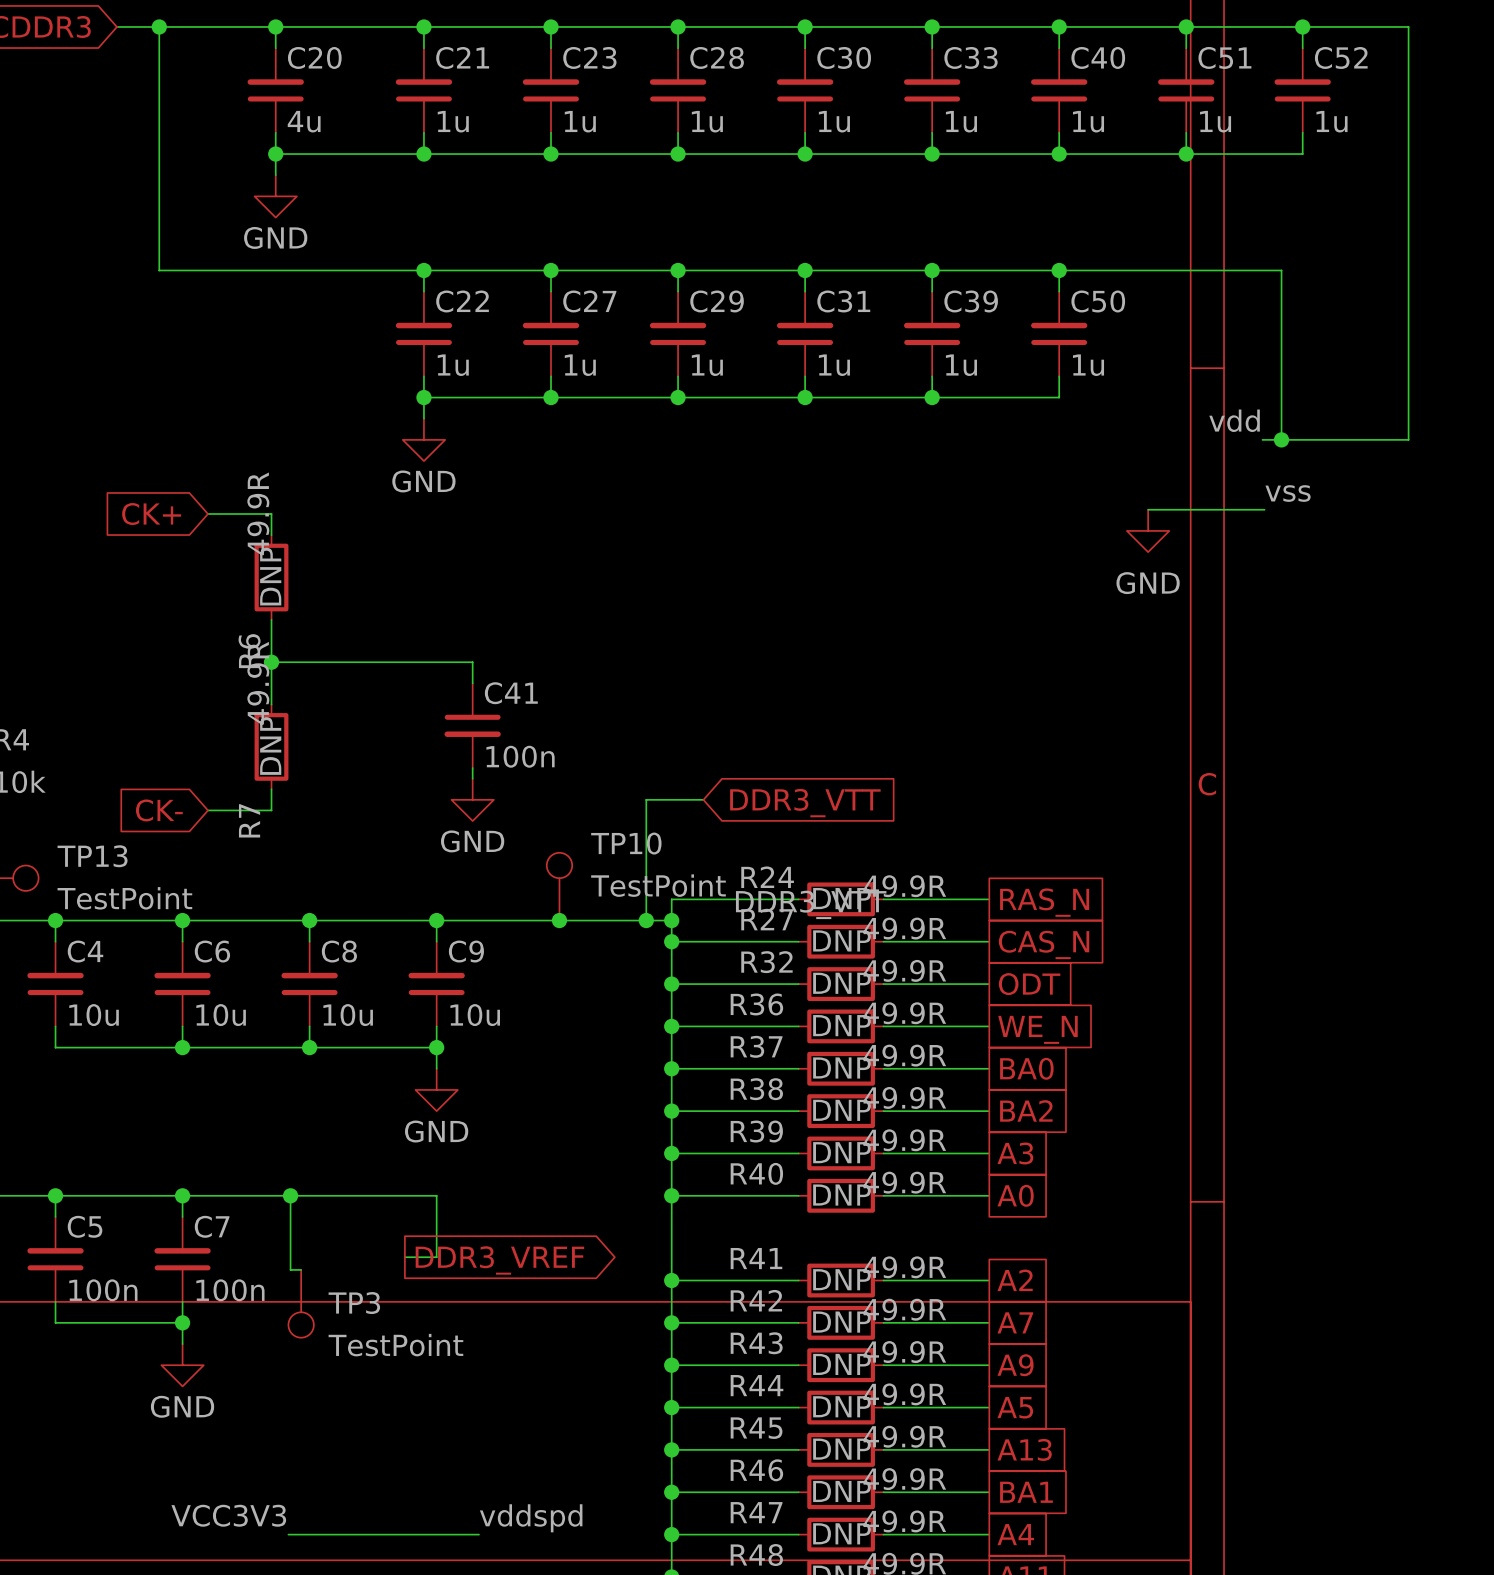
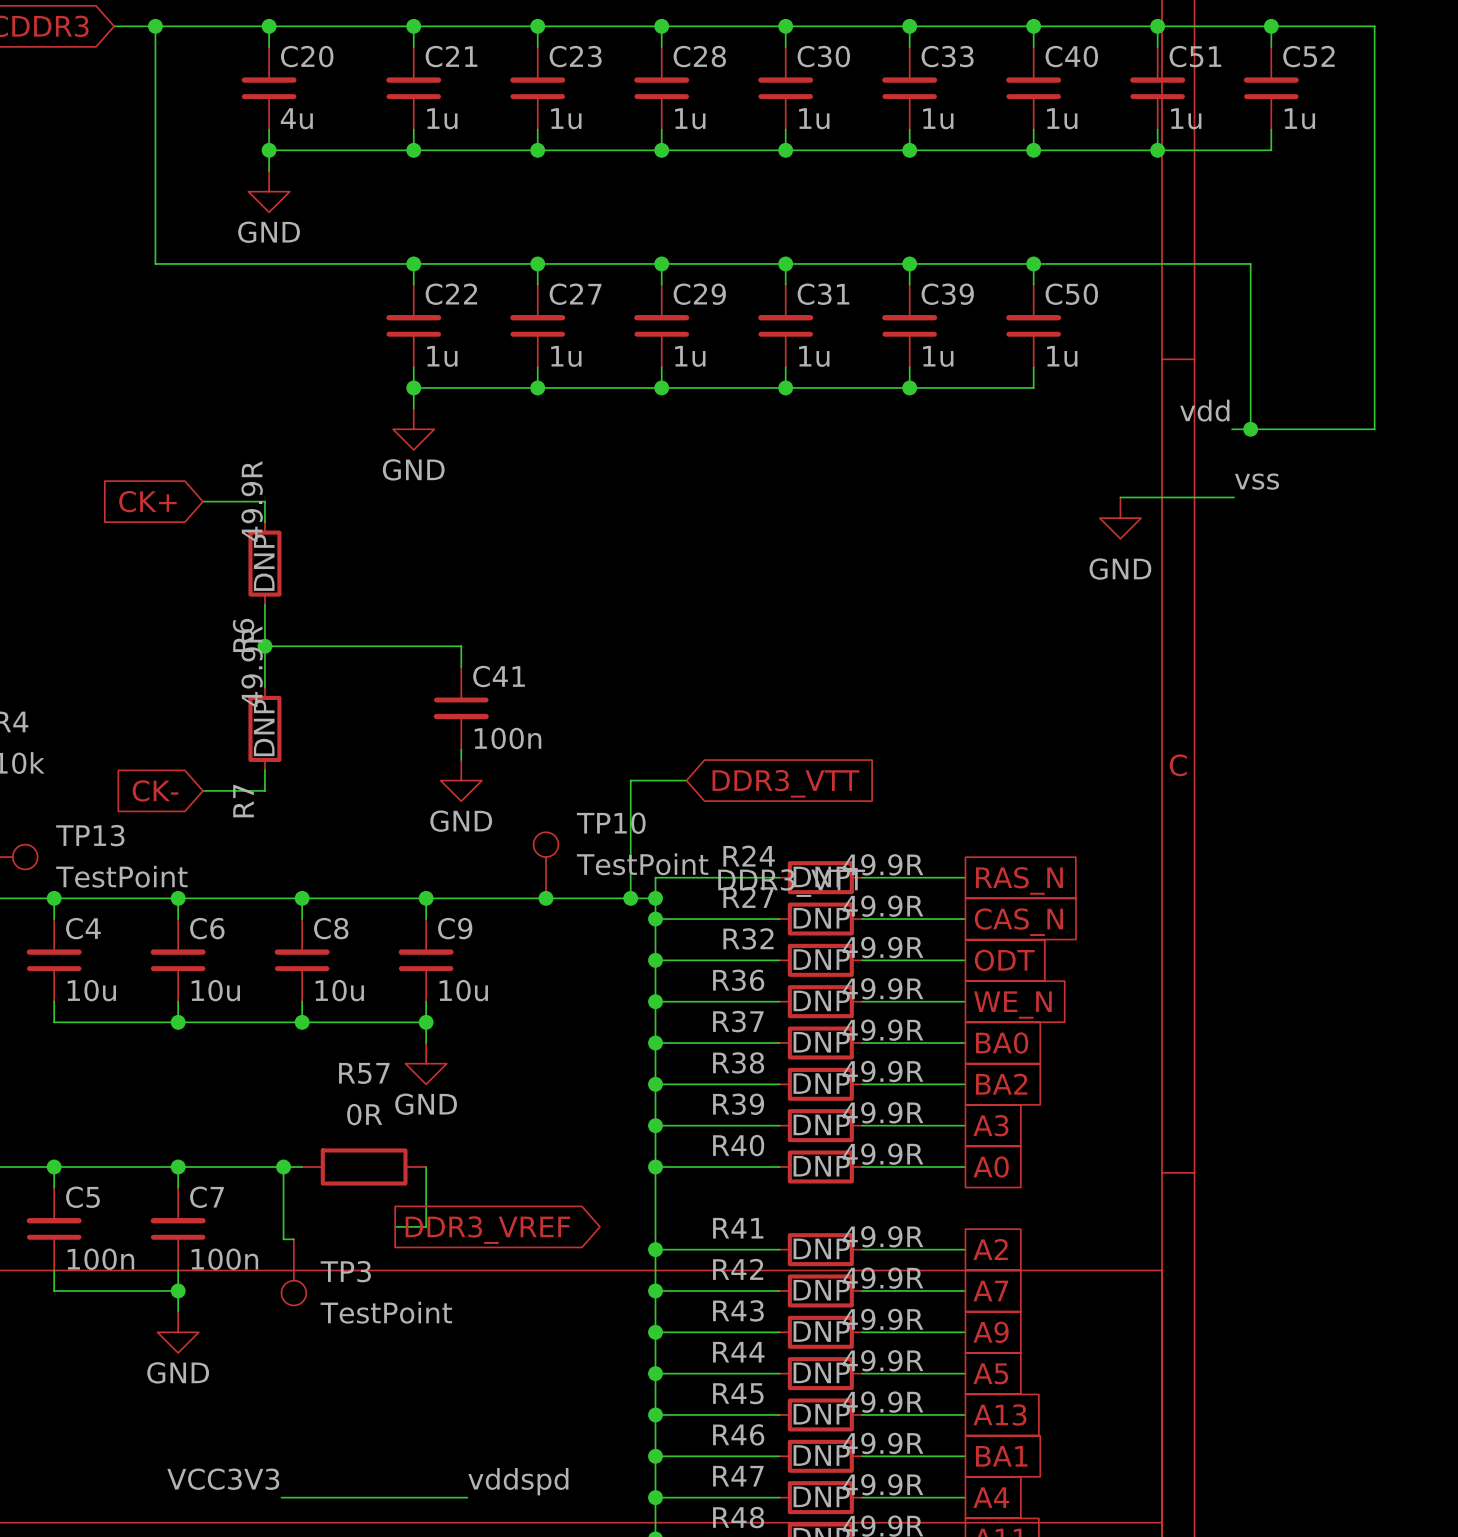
wire: (309, 1195) (436, 1195) -> none
R57: none -> 0R (364, 1167)

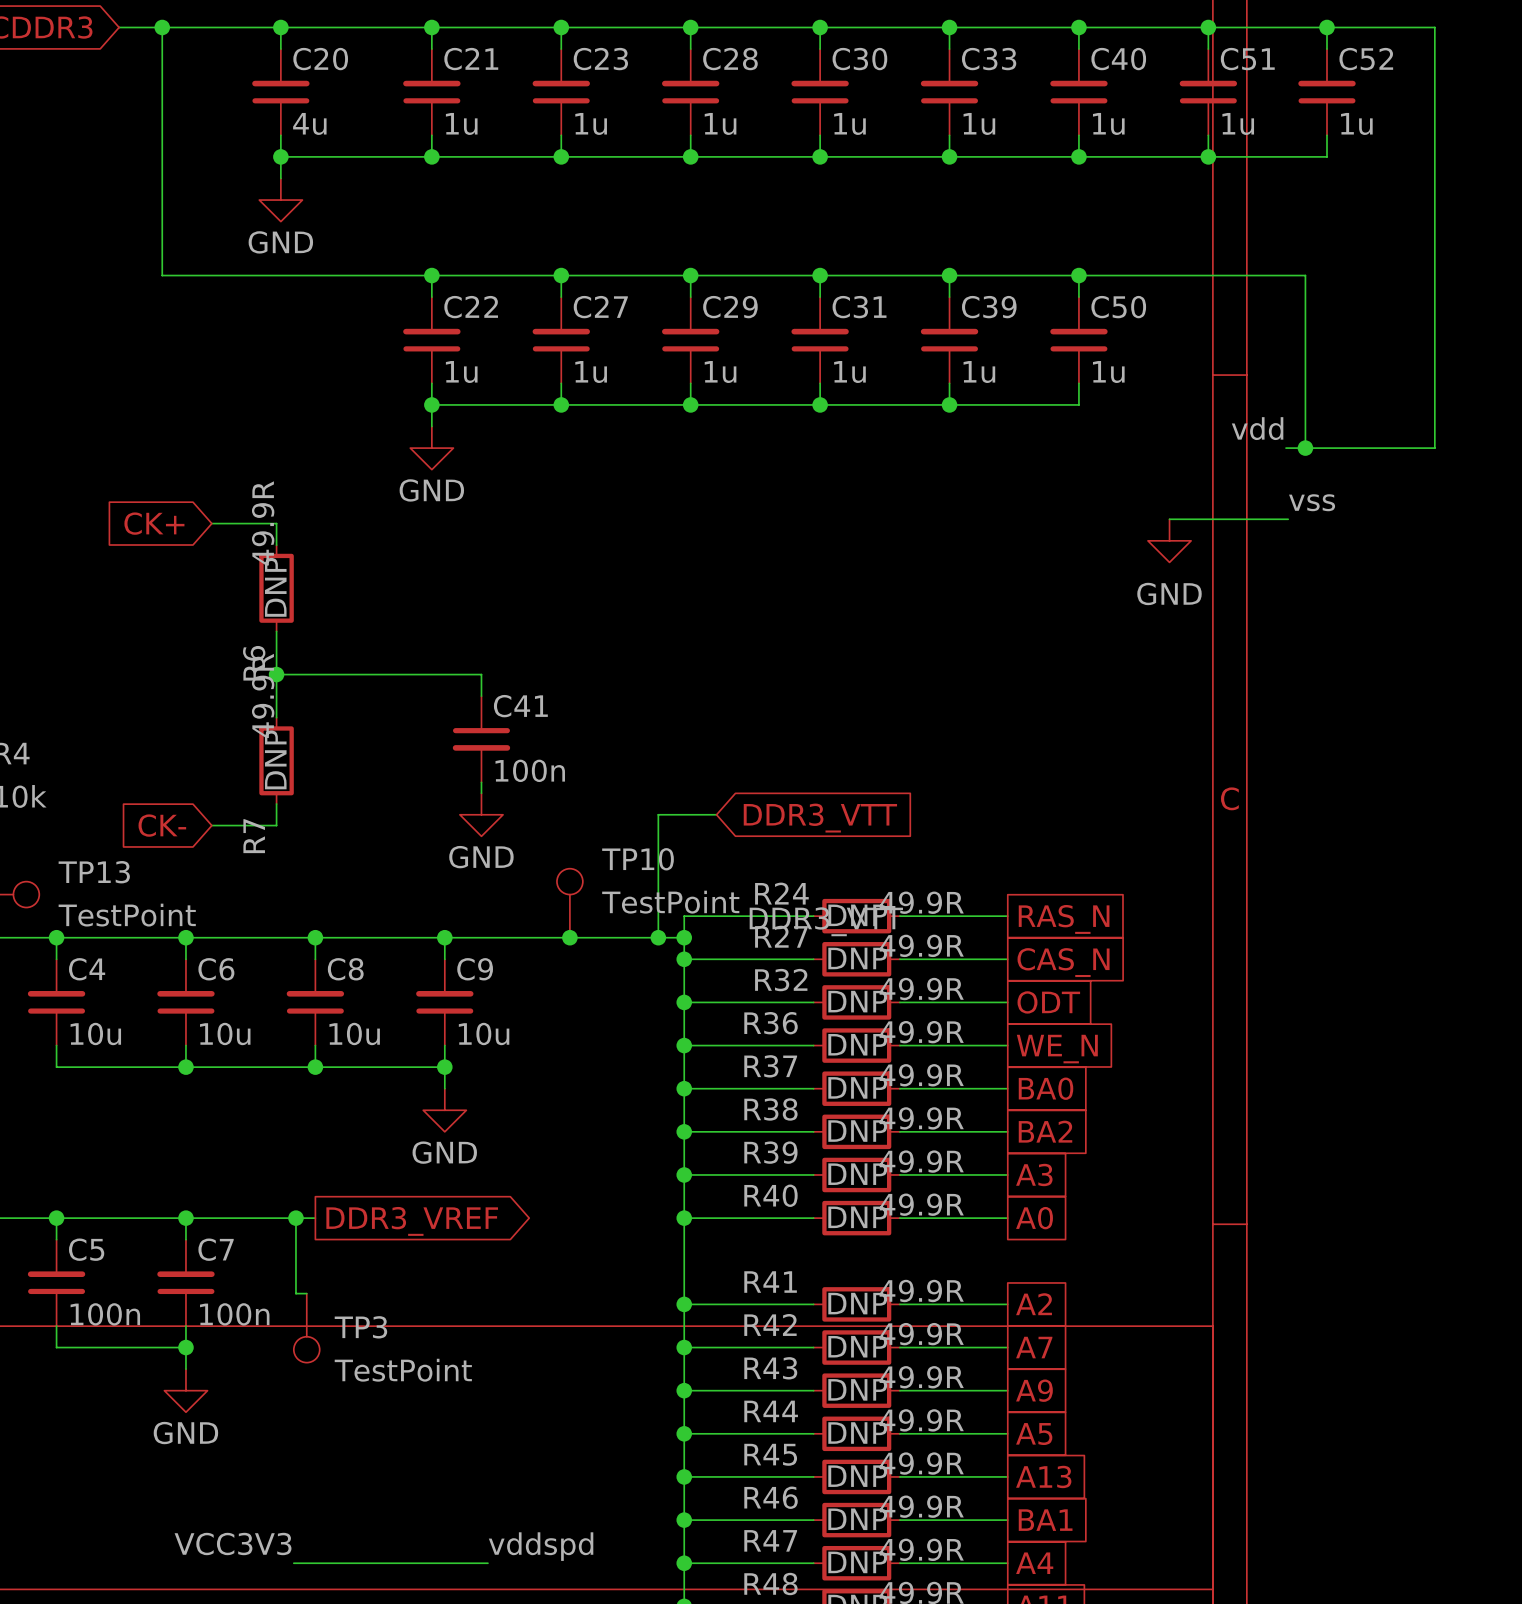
R57: 0R (364, 1167) -> none
wire: (426, 1167) (426, 1226) (395, 1226) -> none
global label position: DDR3_VREF (487, 1230) -> DDR3_VREF (412, 1221)

